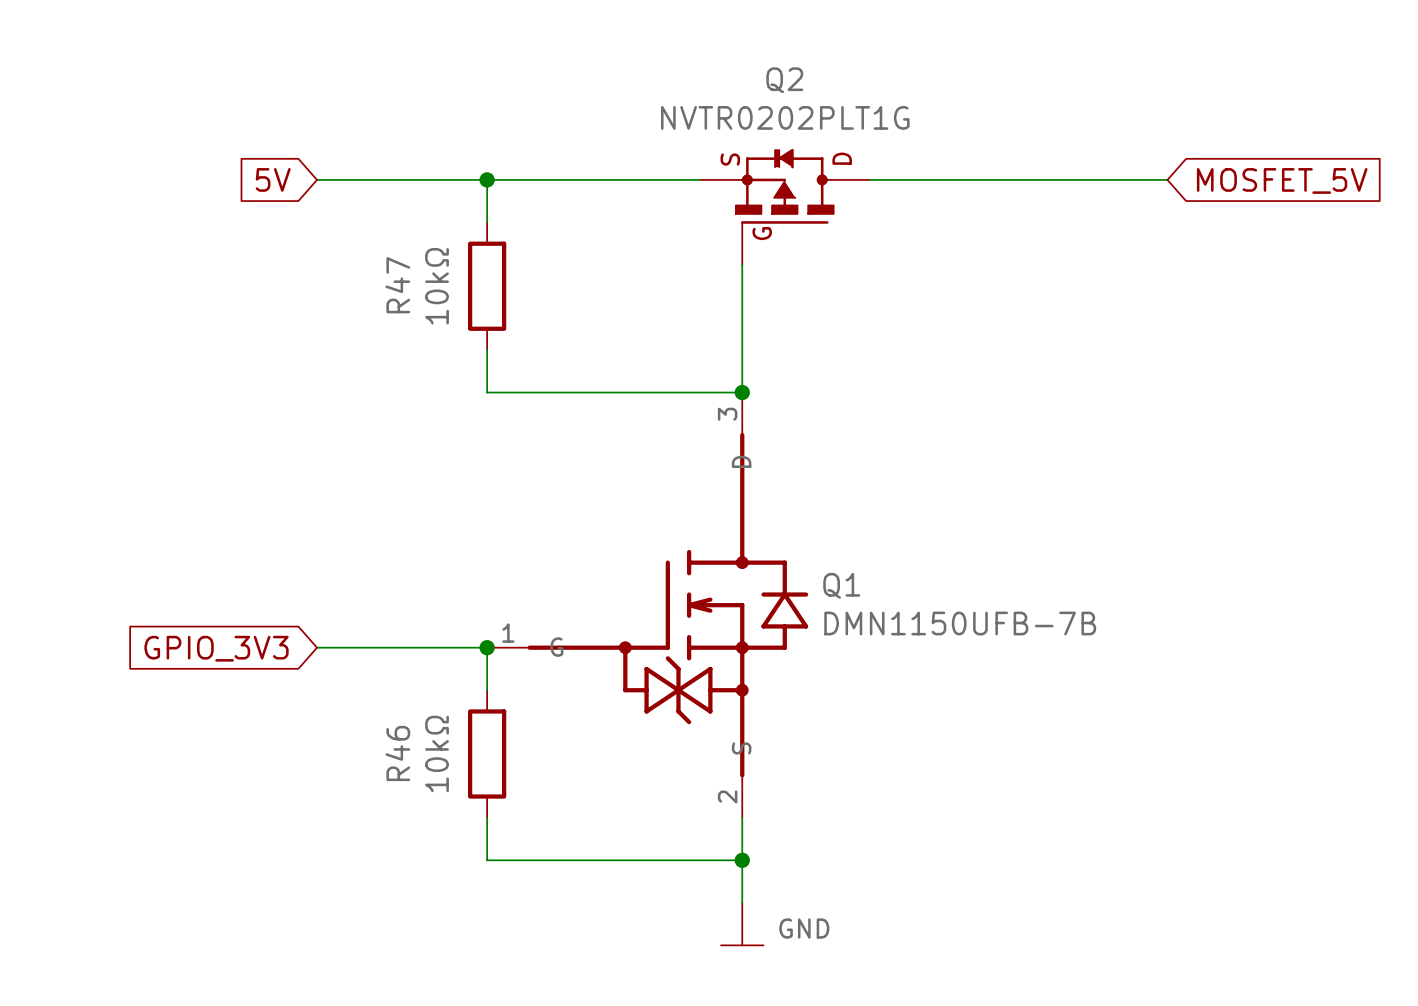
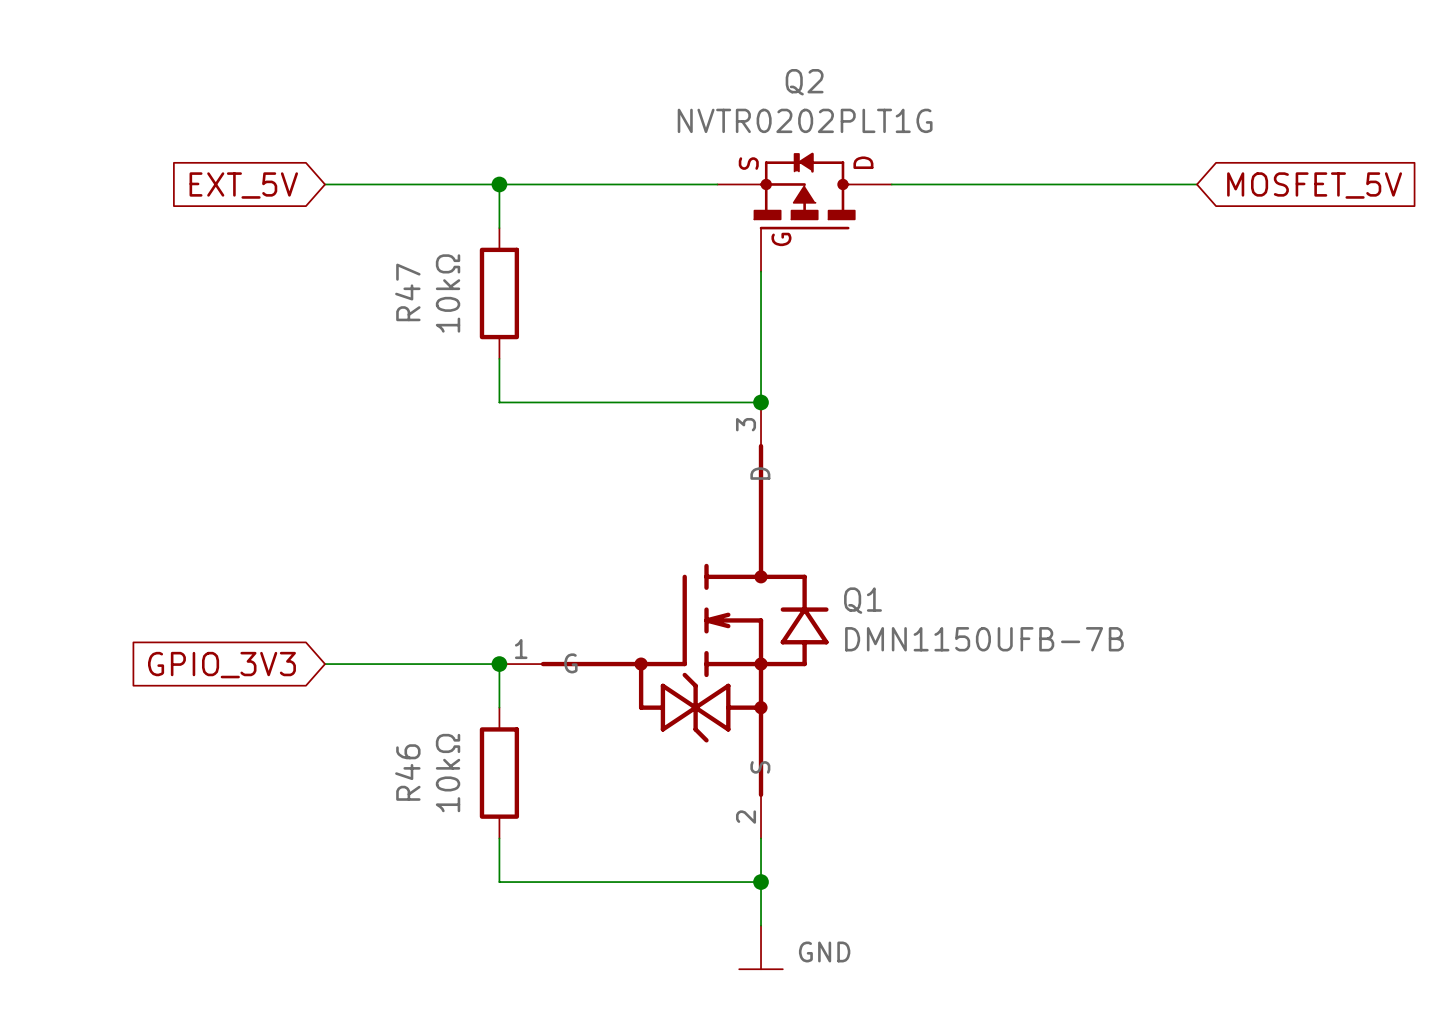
global label: 5V (273, 179) -> EXT_5V (243, 185)

